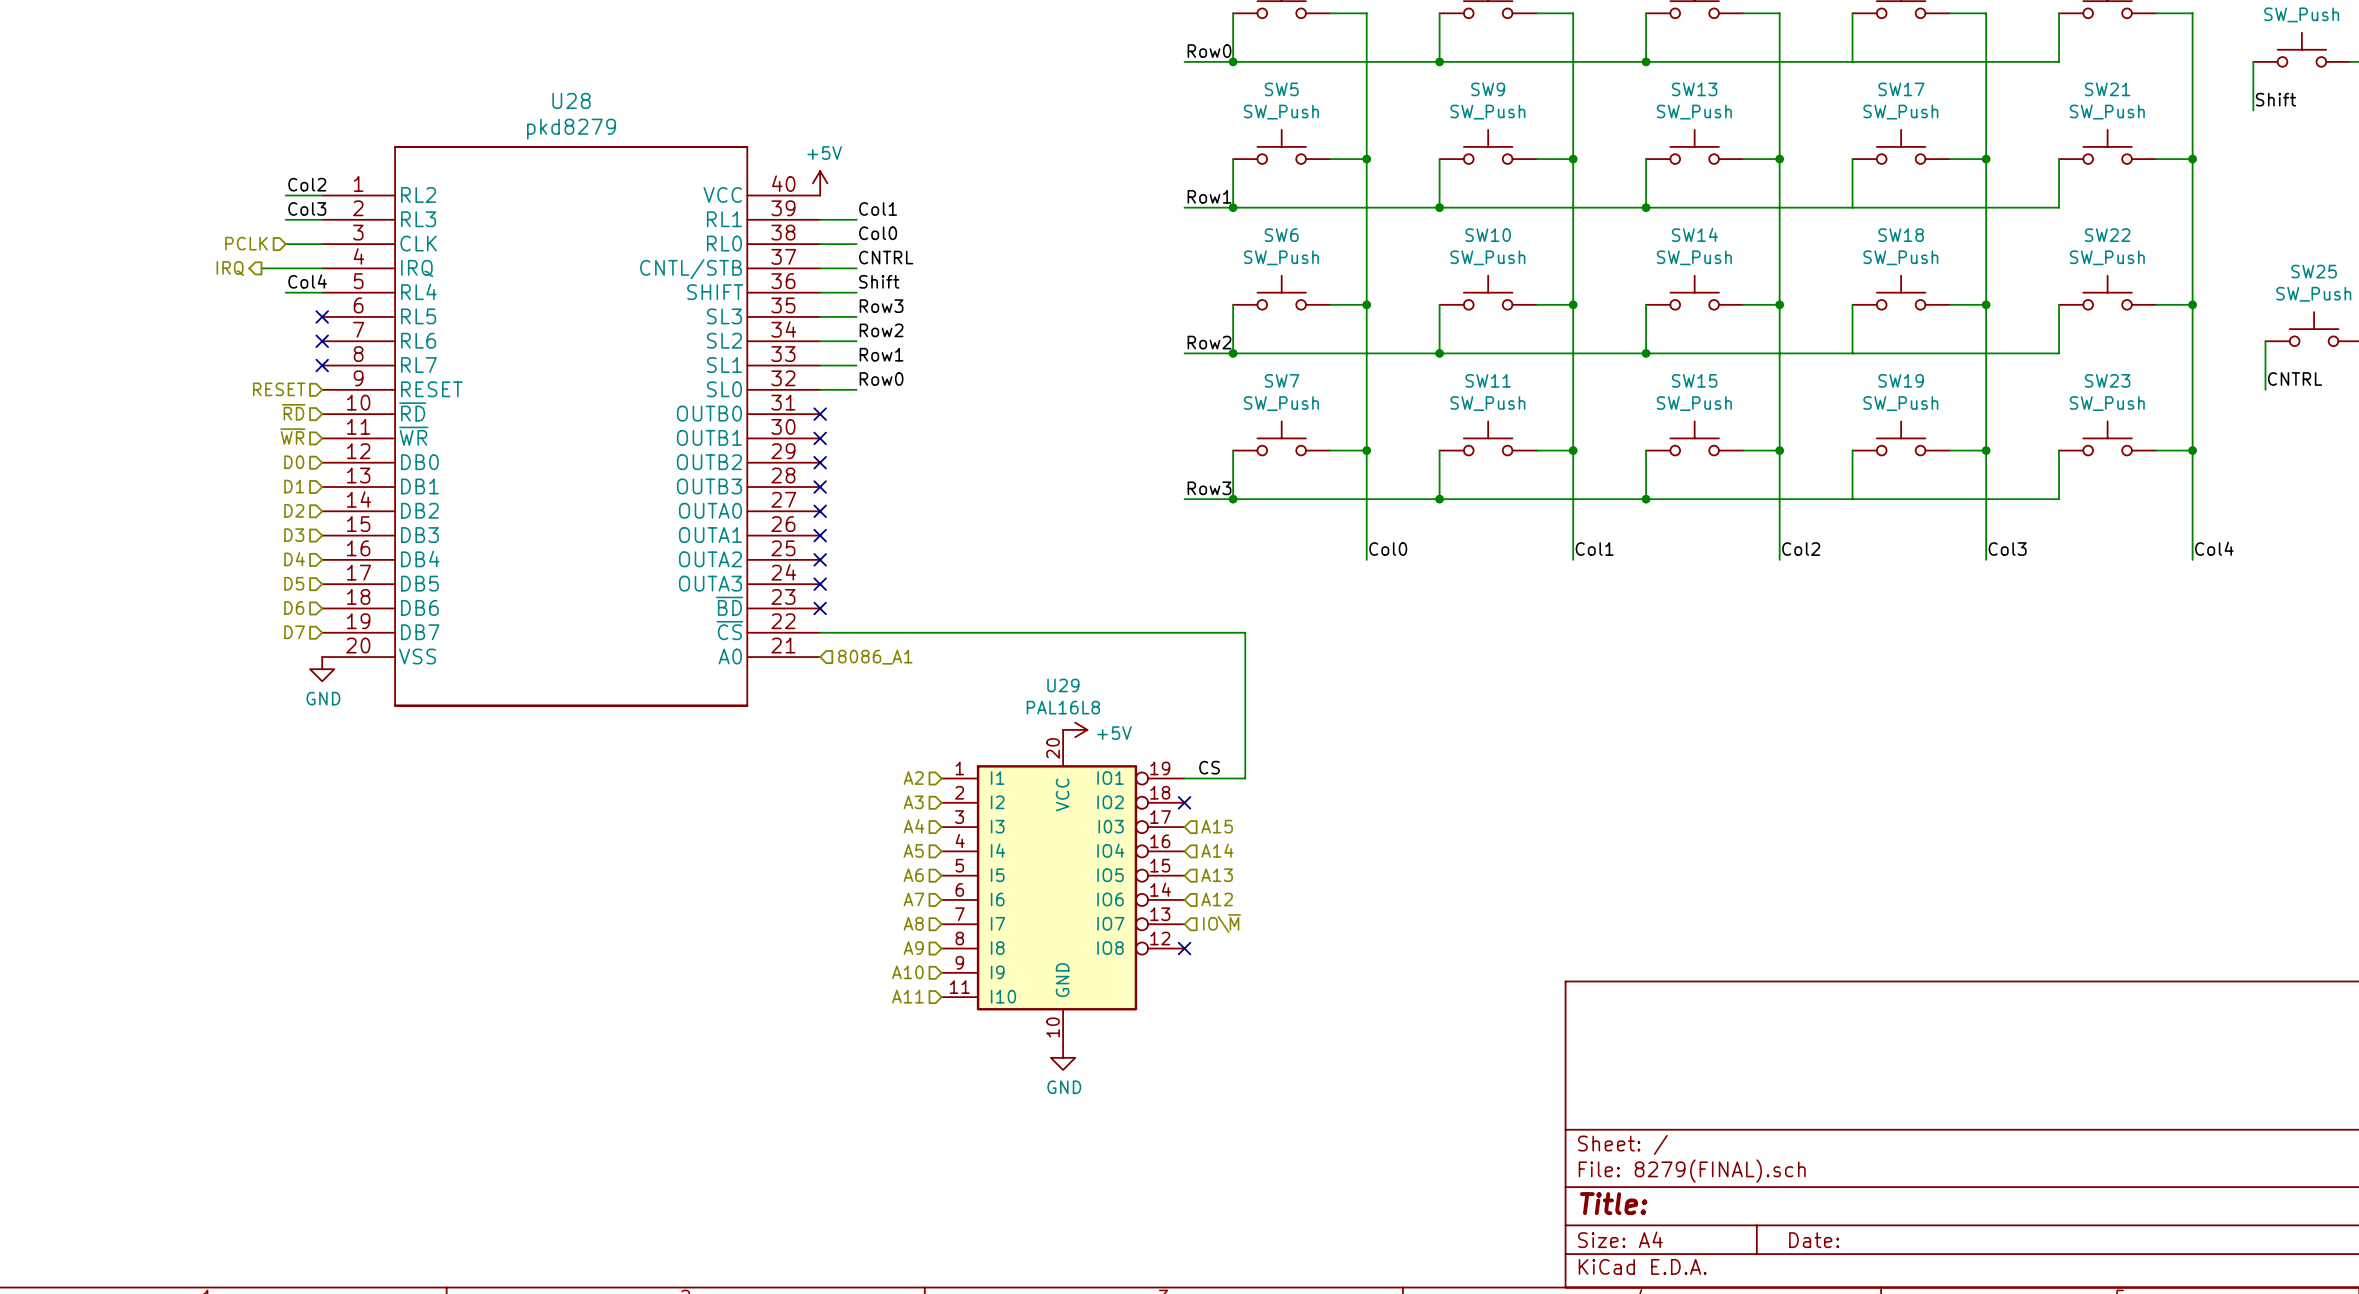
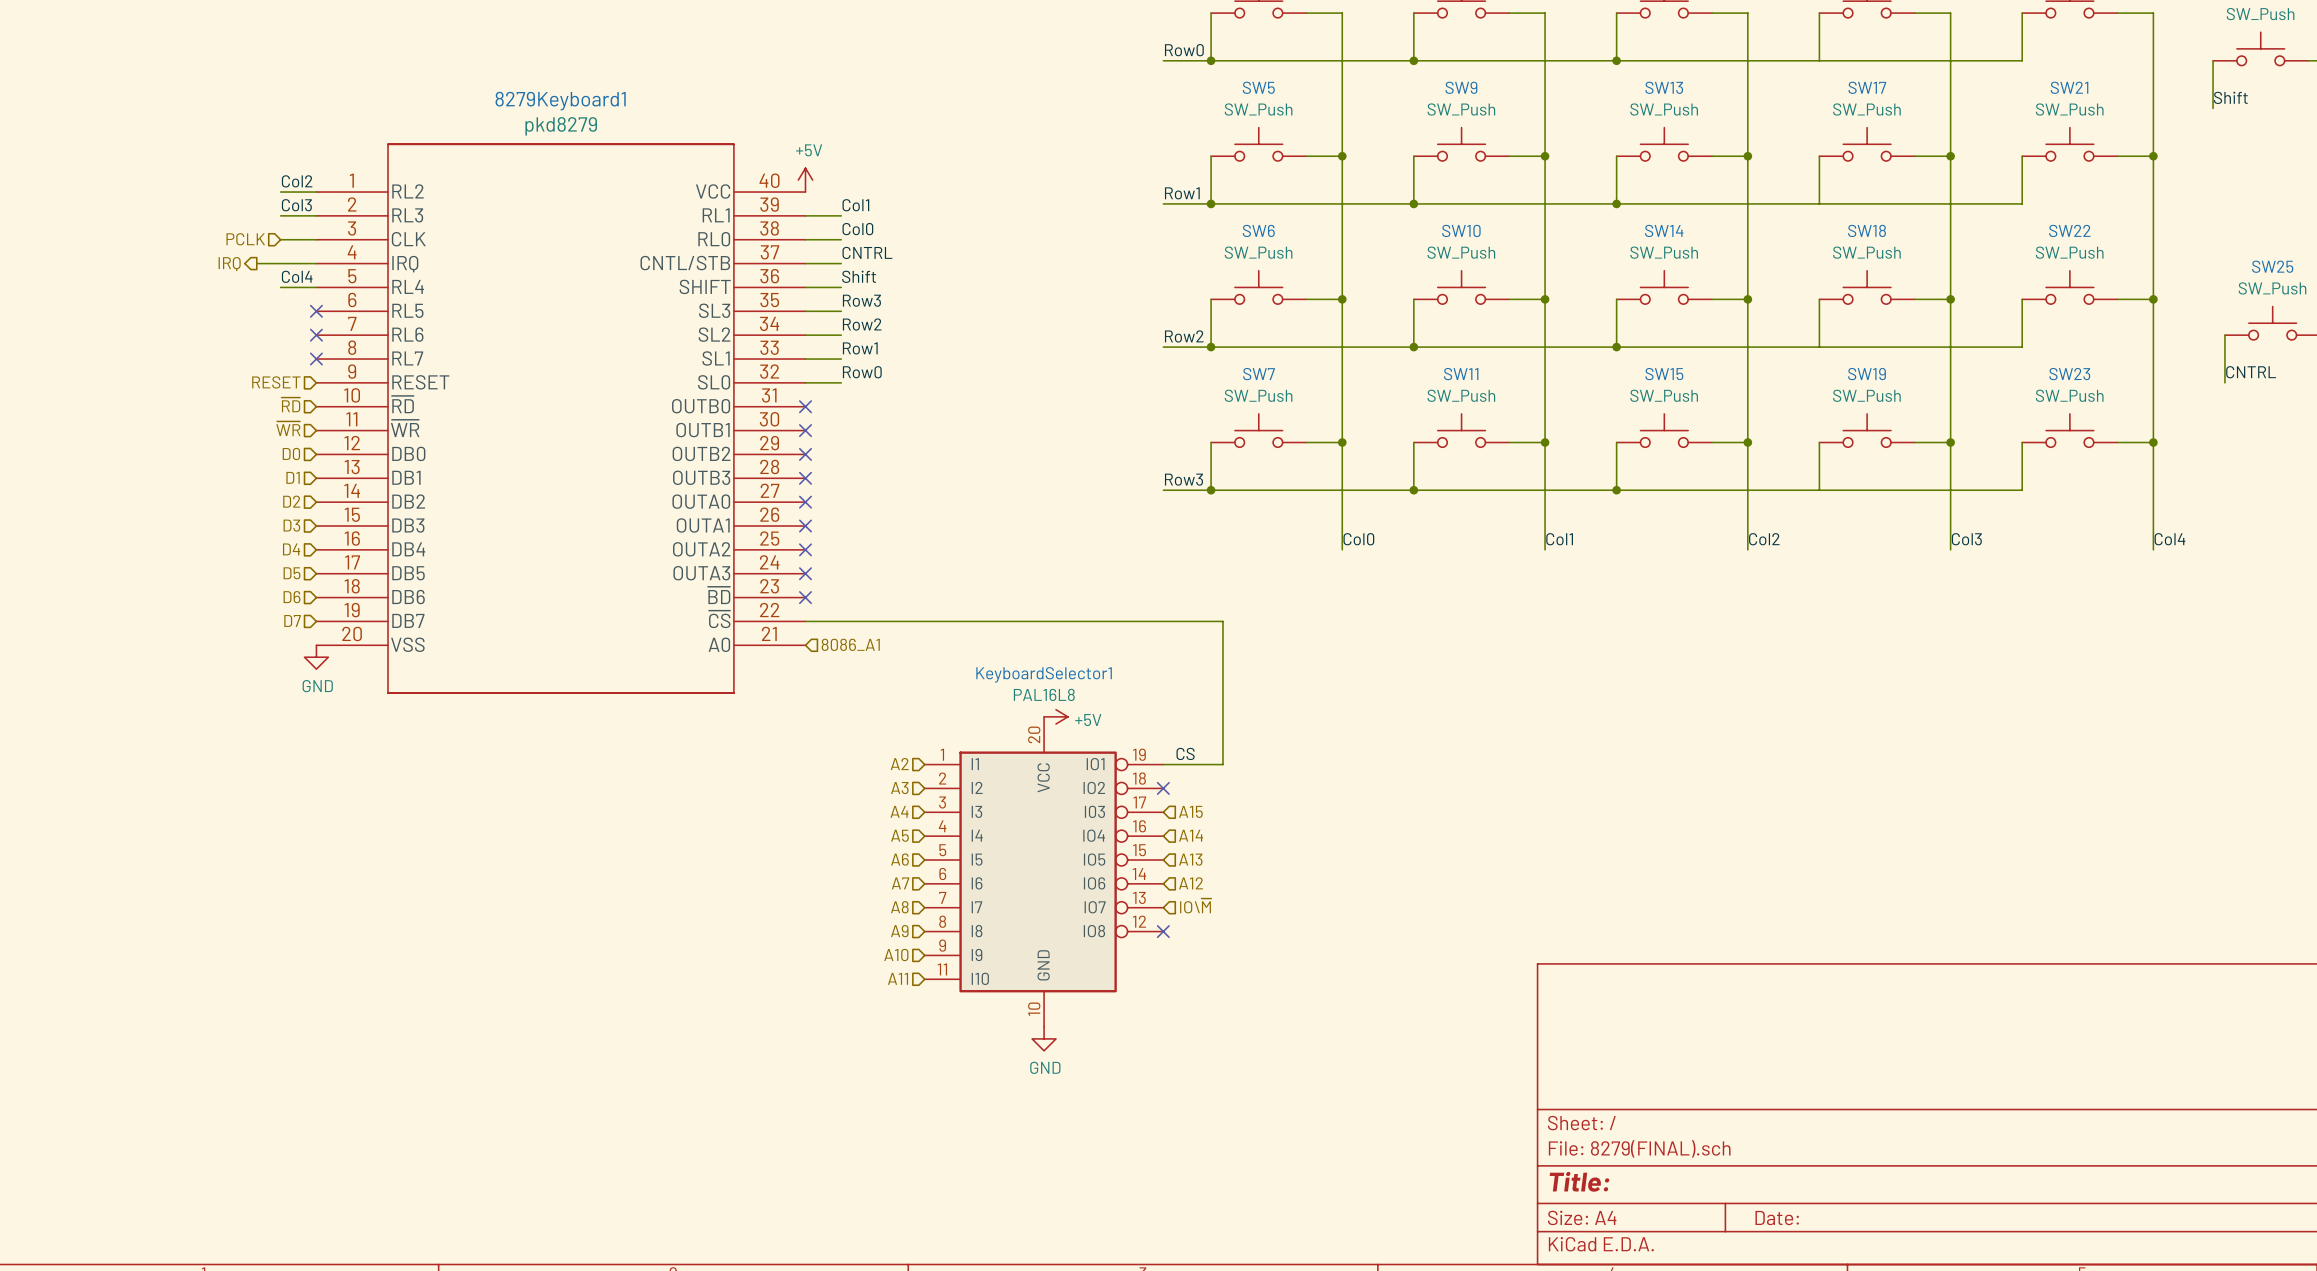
U28 name: U28 (571, 100) -> 8279Keyboard1 (560, 101)
U29 name: U29 (1063, 685) -> KeyboardSelector1 (1044, 674)

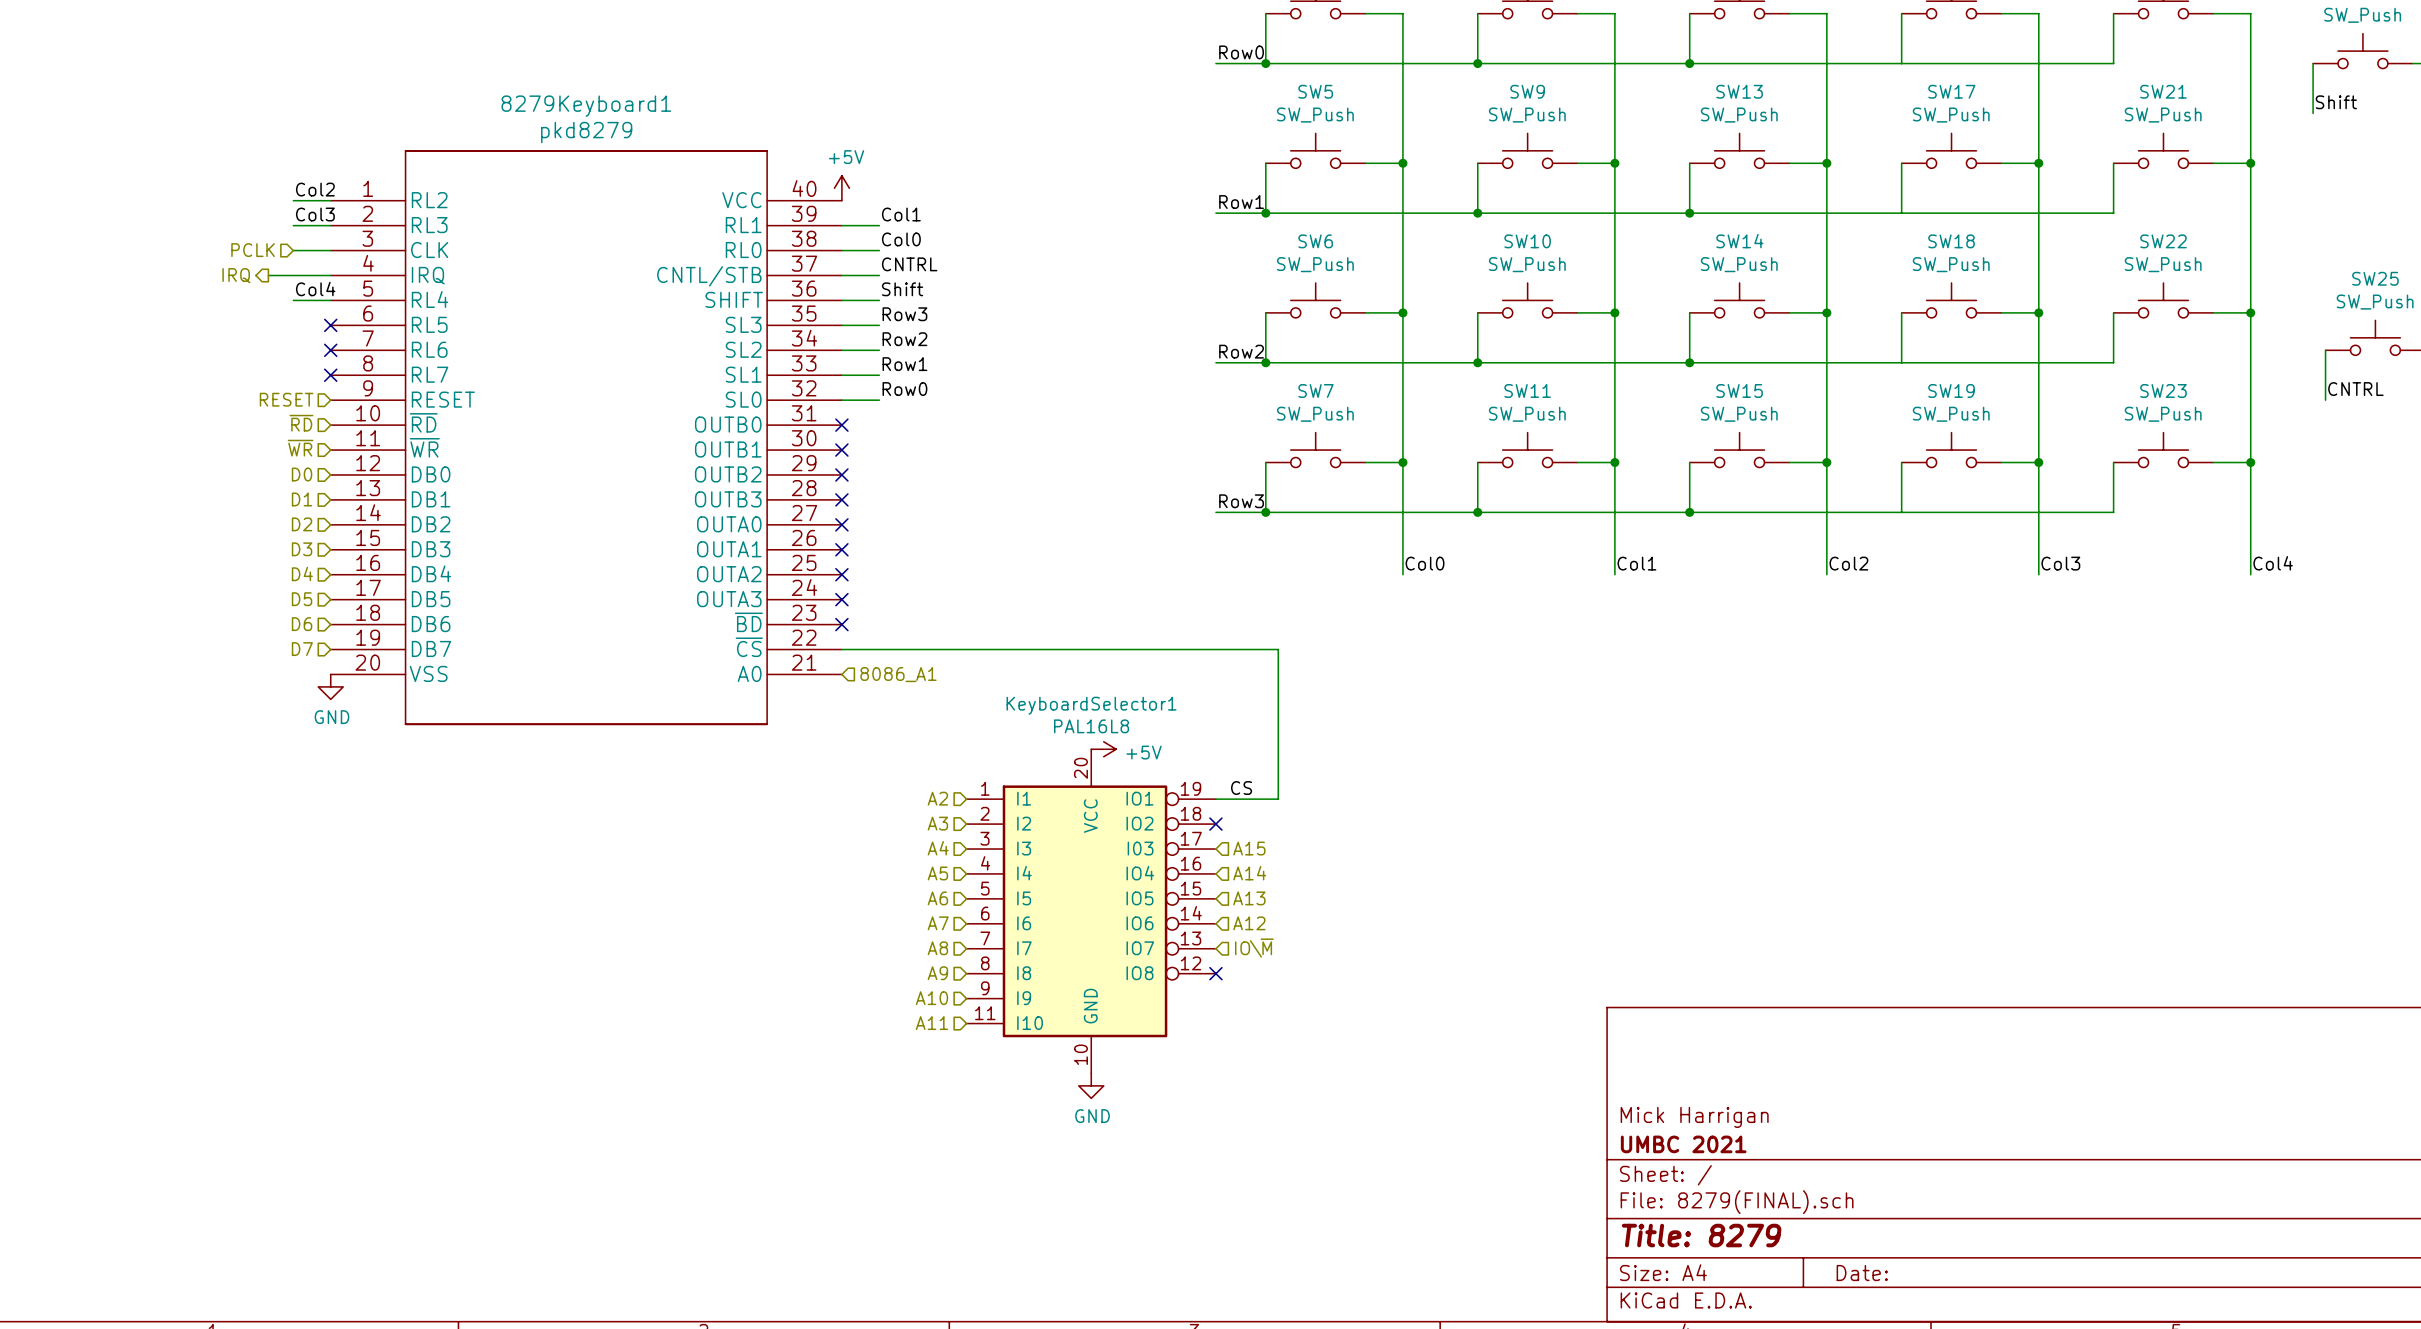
title block: none -> Mick Harrigan (1694, 1117)
title block: none -> UMBC 2021 (1683, 1144)
title block: Title: (1579, 1181) -> Title: 8279 (1701, 1235)

